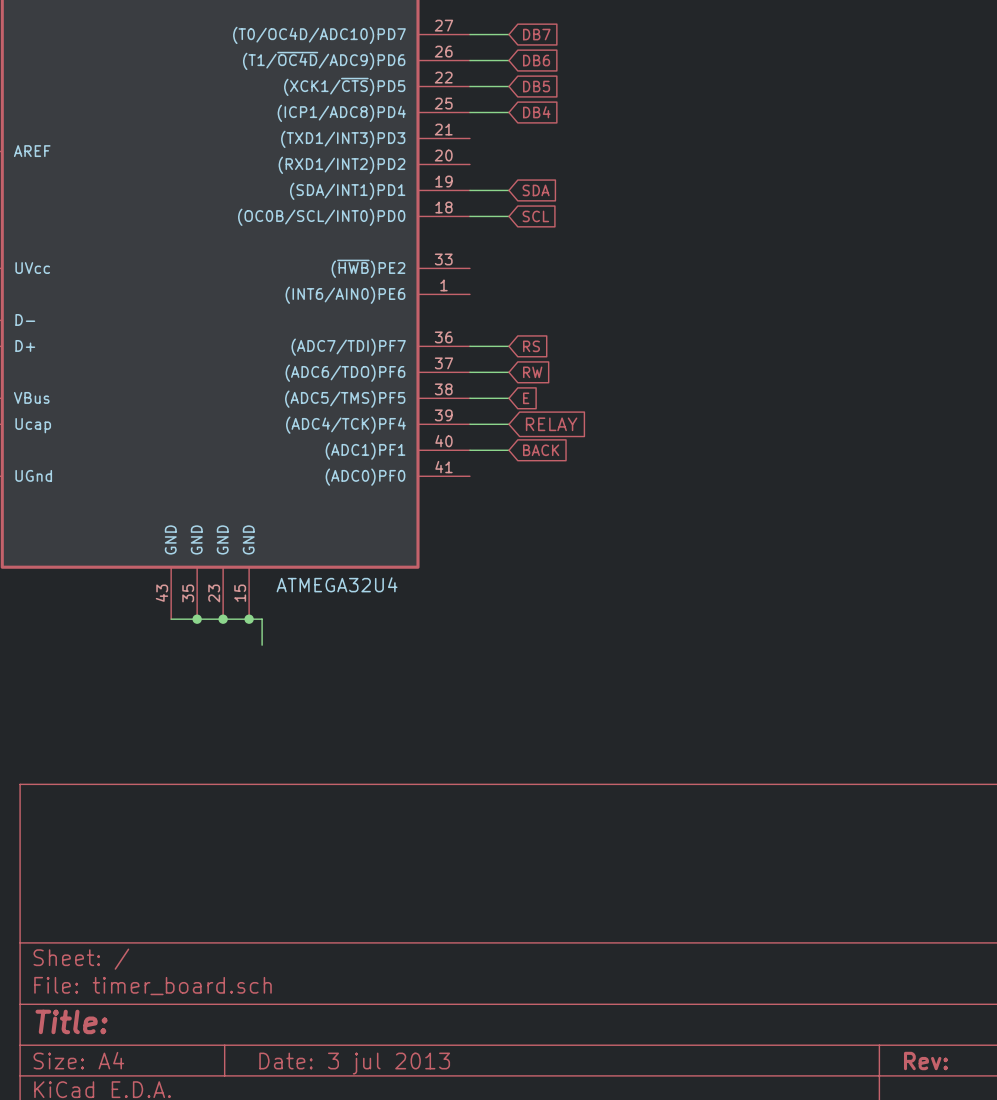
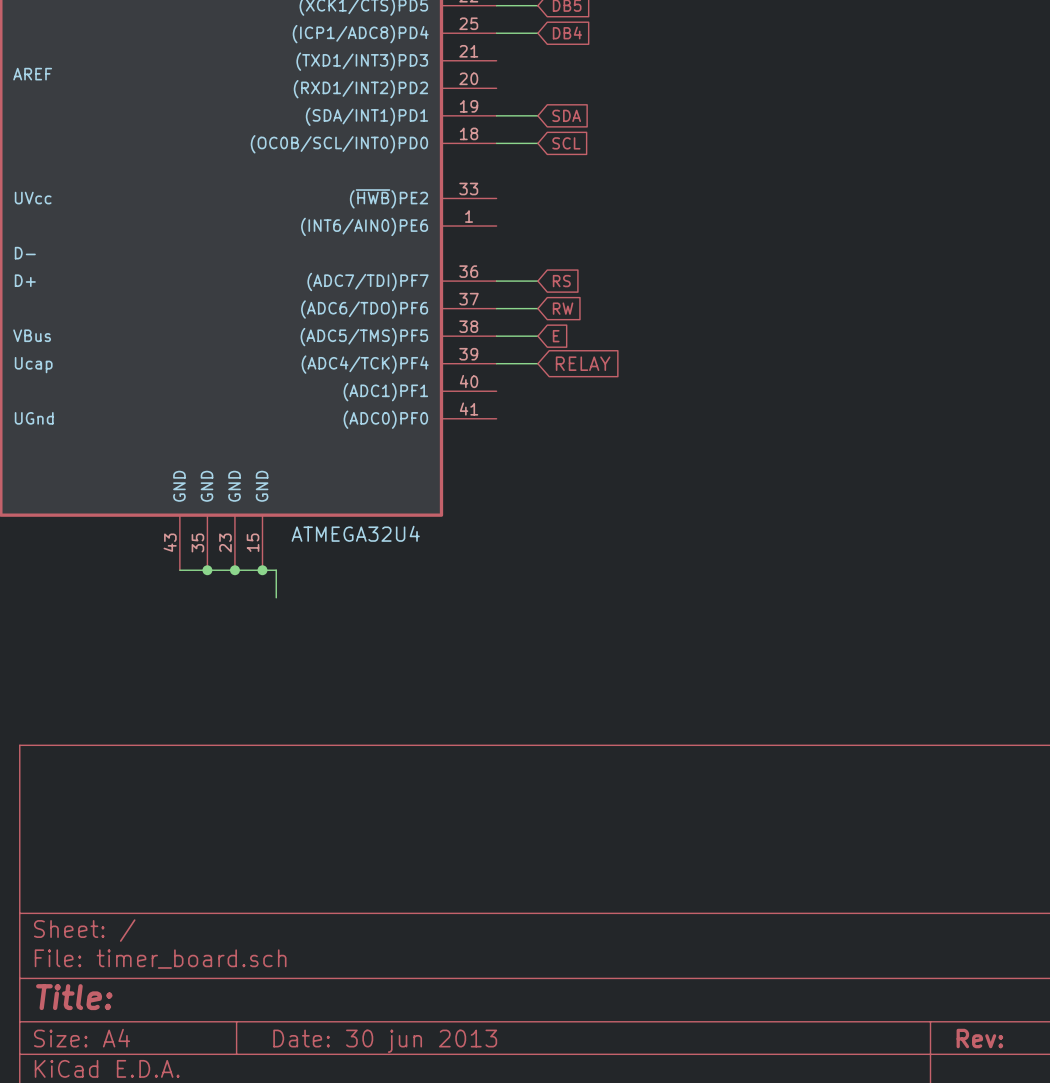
wire: (469, 450) (508, 450) -> none
global label: BACK (541, 450) -> none
title block: Date: 3 jul 2013 (354, 1063) -> Date: 30 jun 2013 (385, 1041)

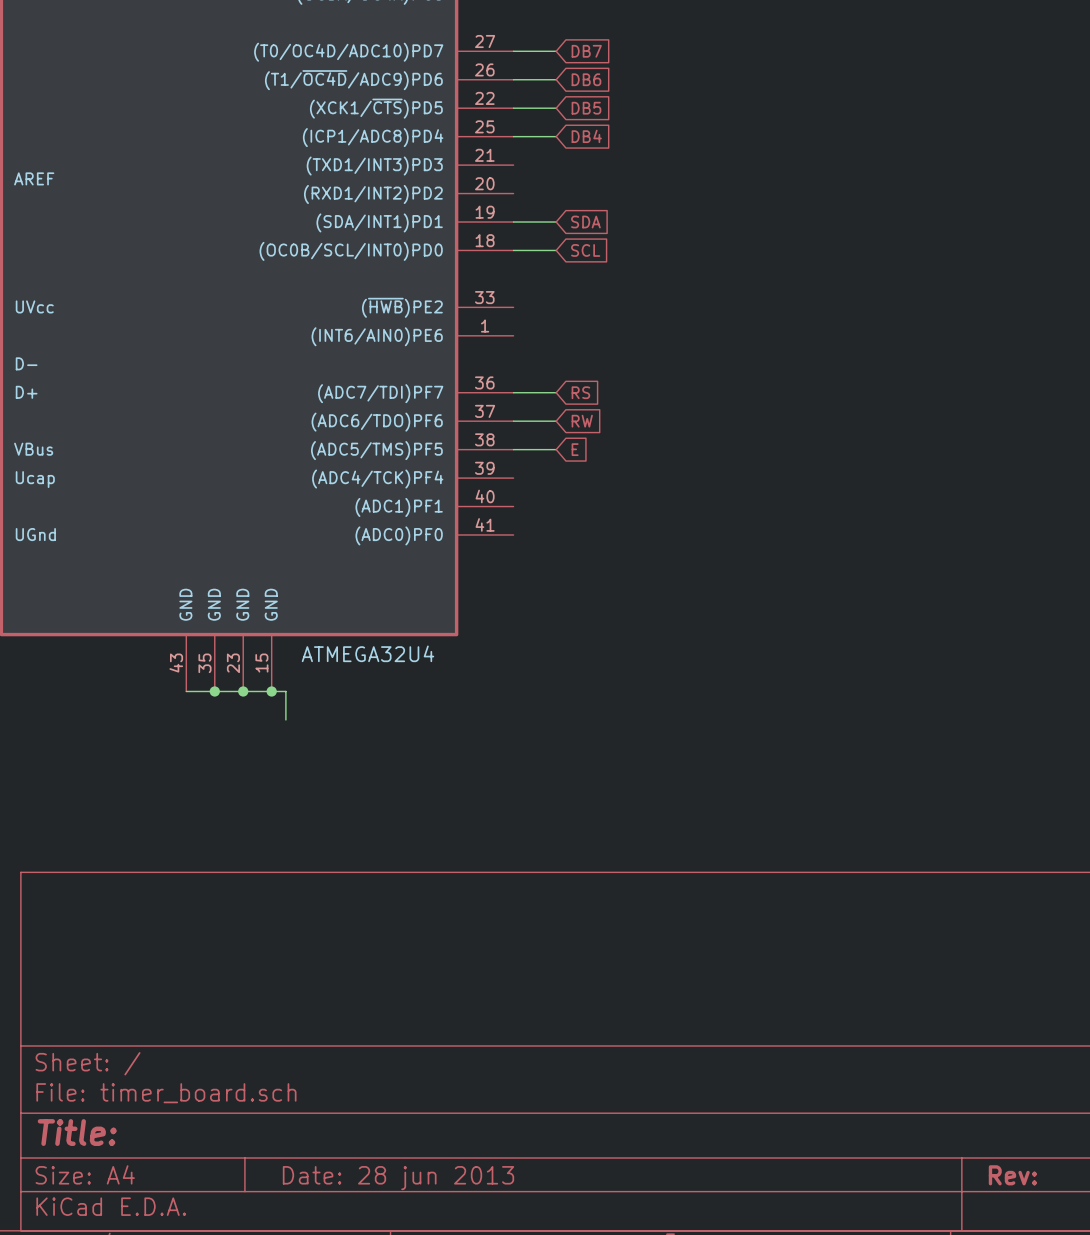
wire: (496, 363) (537, 363) -> none
global label: RELAY (583, 363) -> none
title block: Date: 30 jun 2013 (385, 1041) -> Date: 28 jun 2013 (398, 1178)

